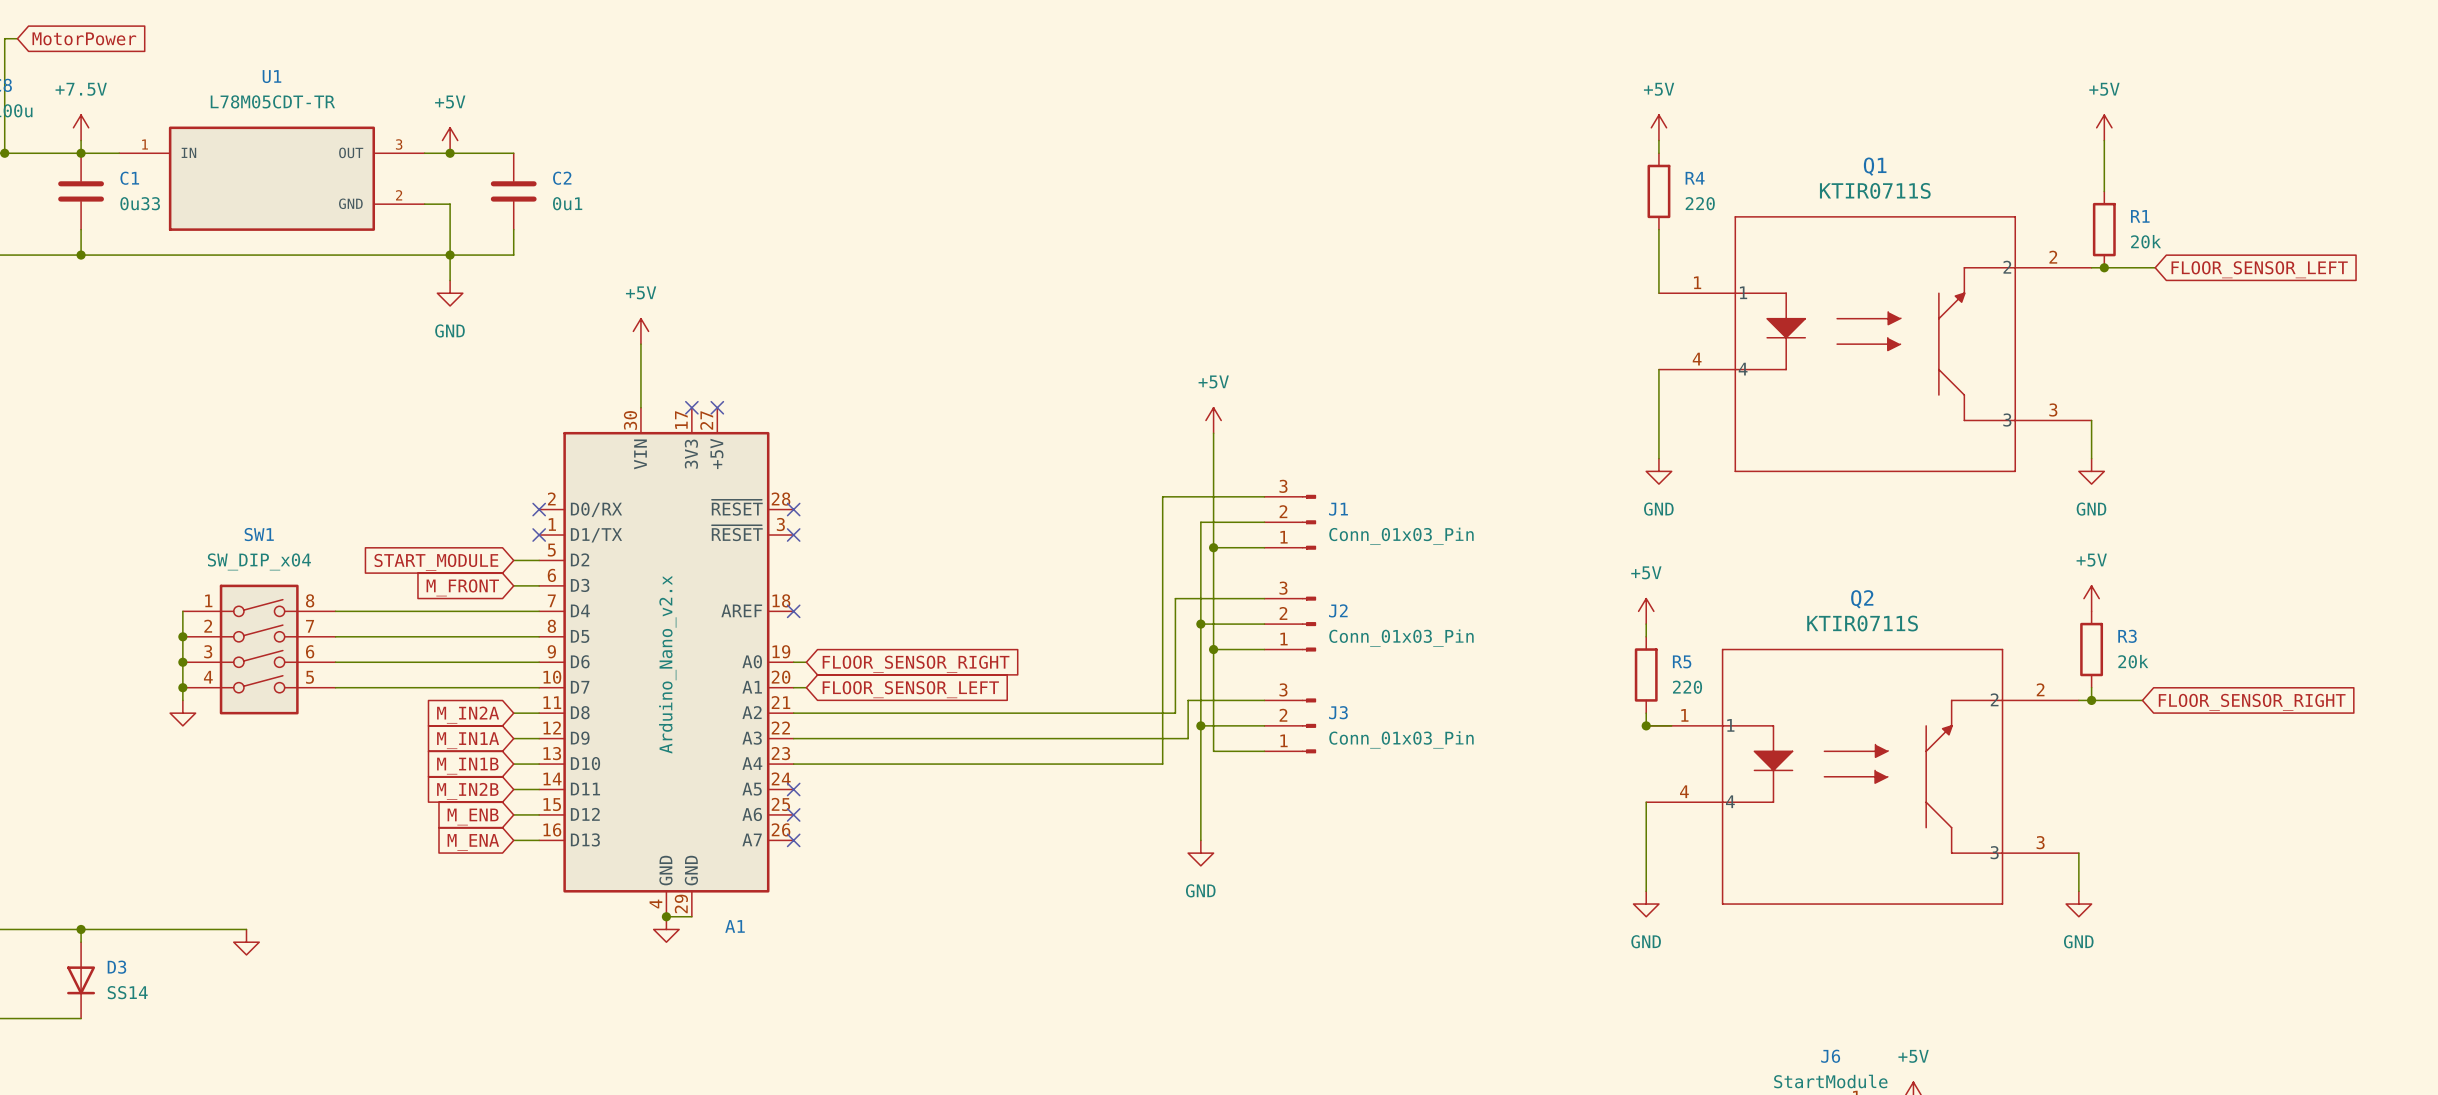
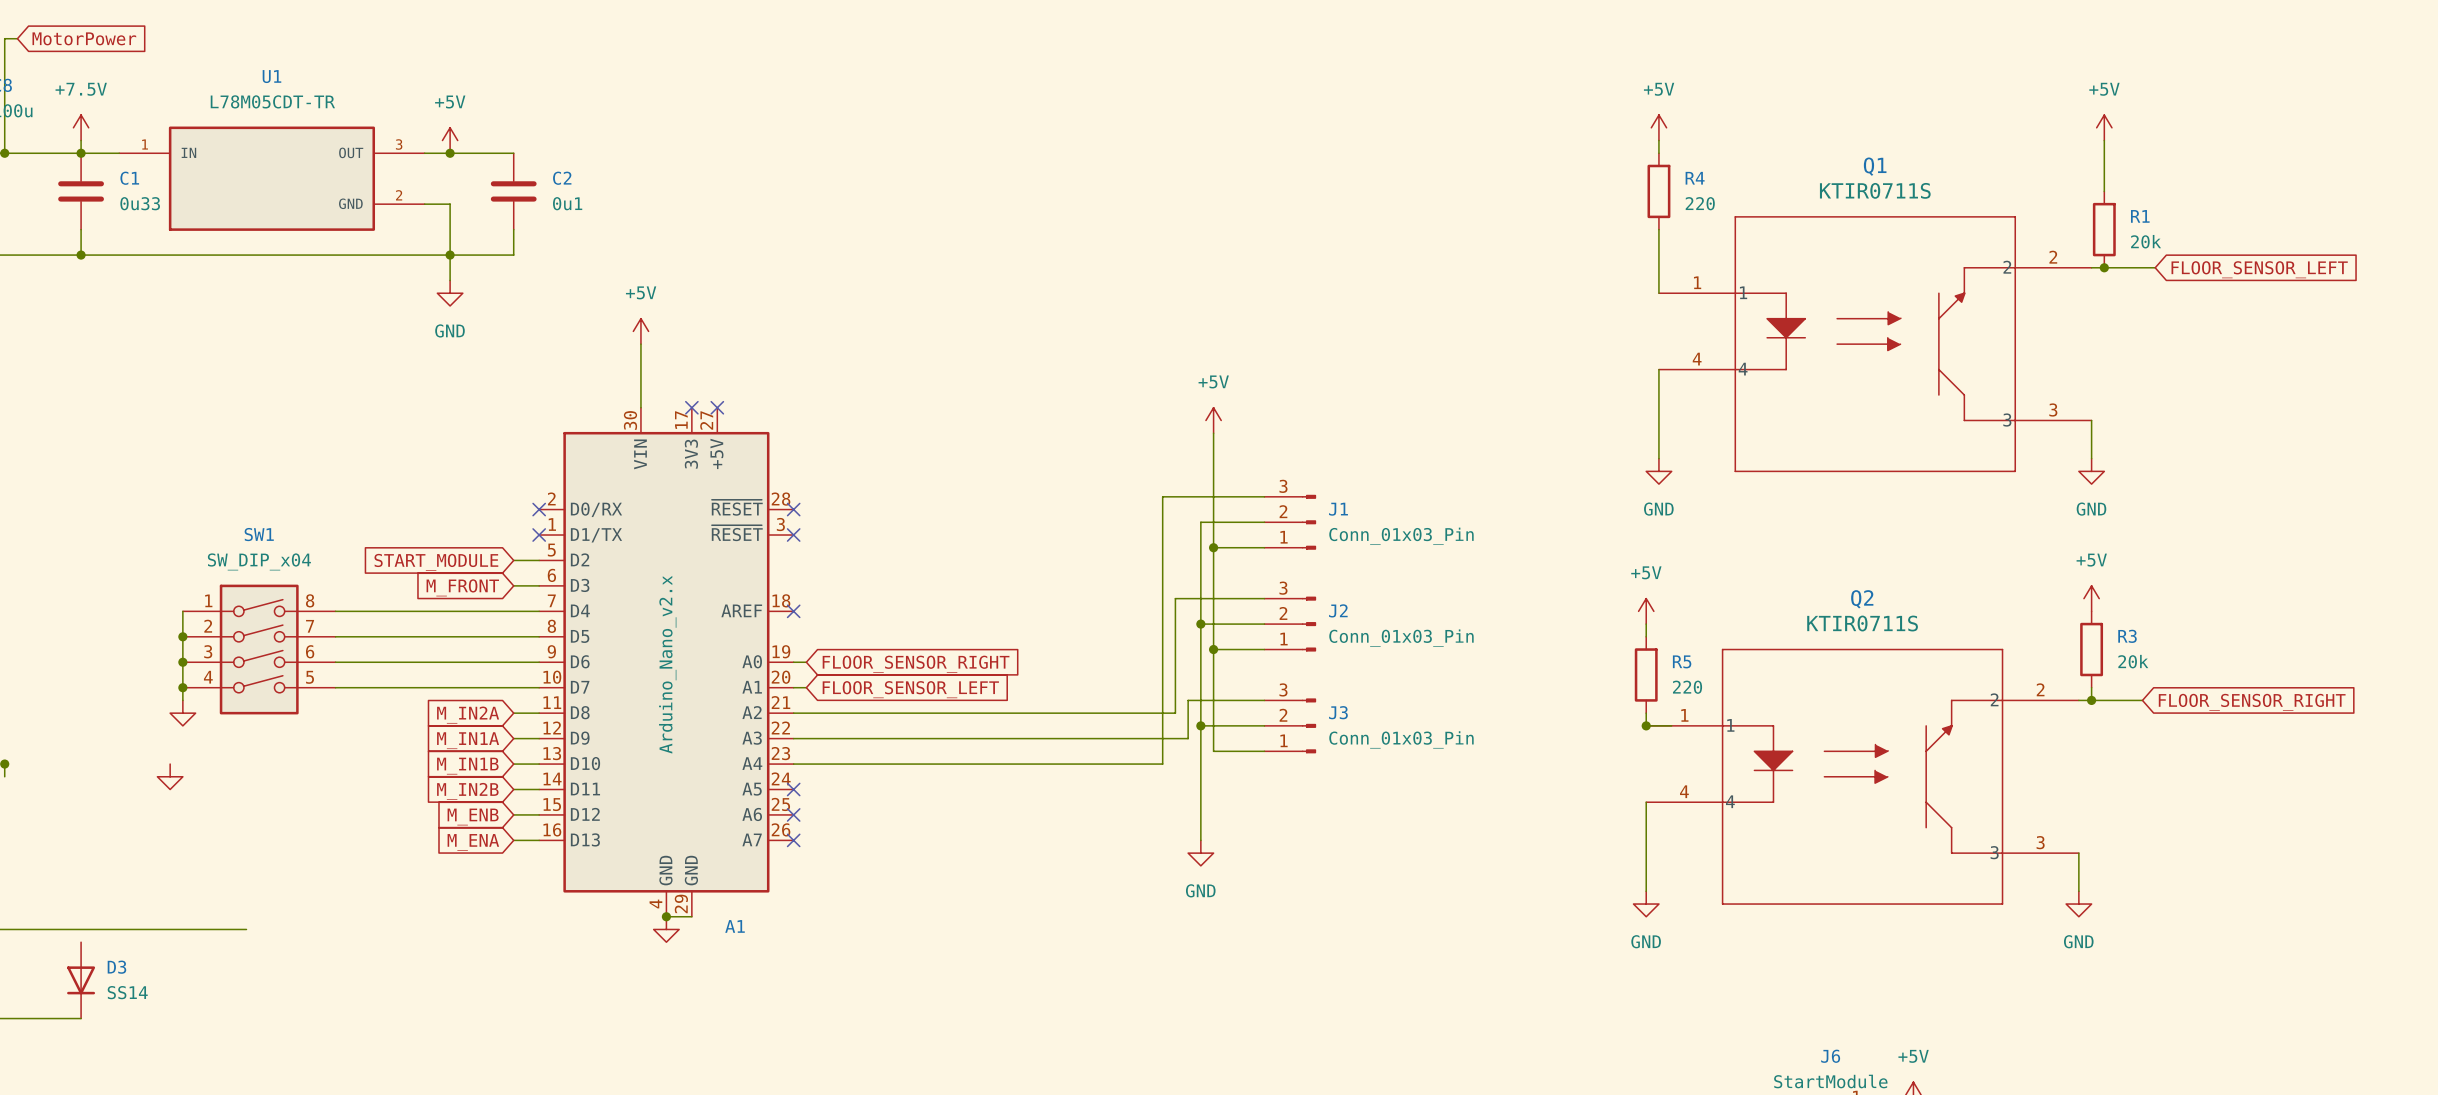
junction: none -> (4, 764)
power symbol: none -> (170, 776)
wire: (81, 929) (81, 942) -> (4, 764) (4, 776)
junction: (81, 929) -> none
power symbol: (246, 942) -> none

